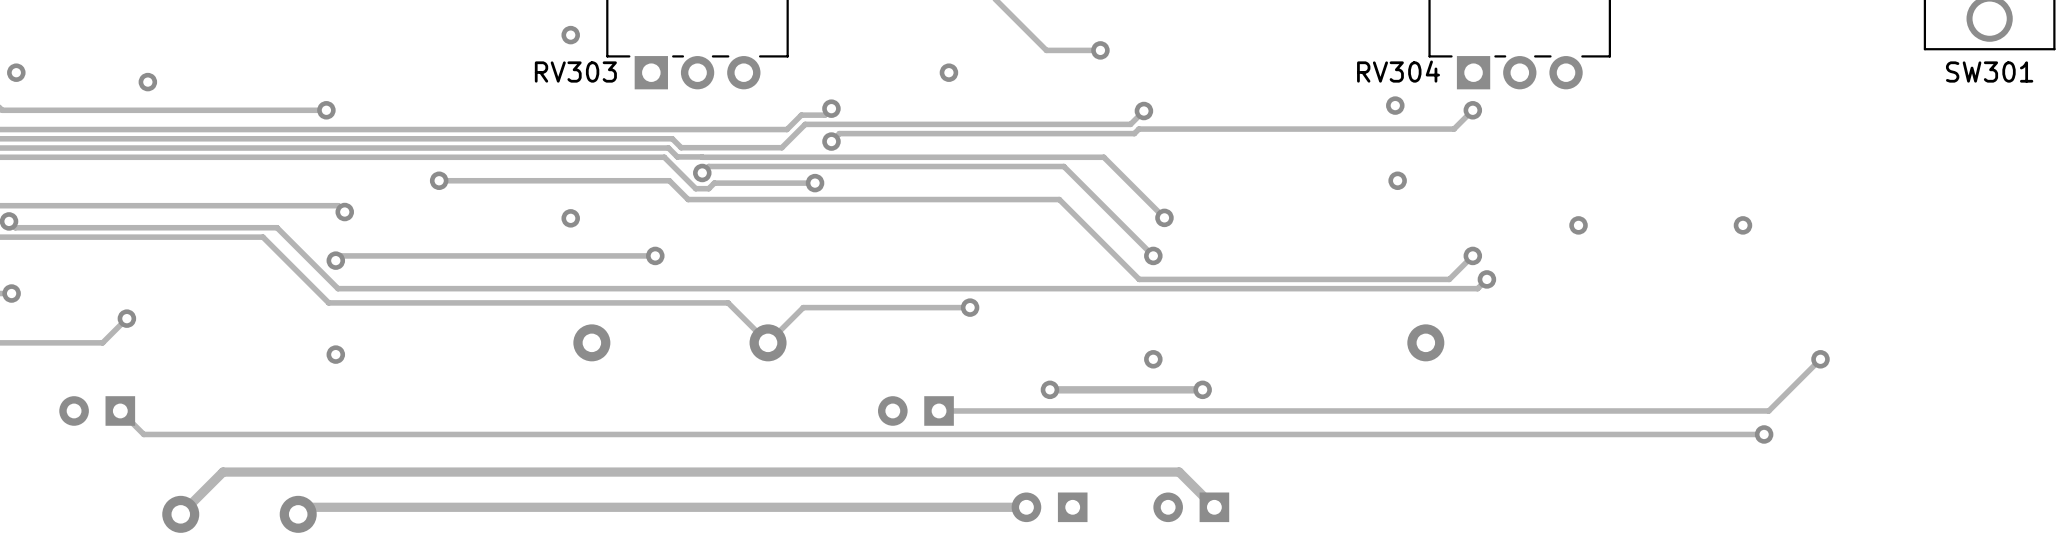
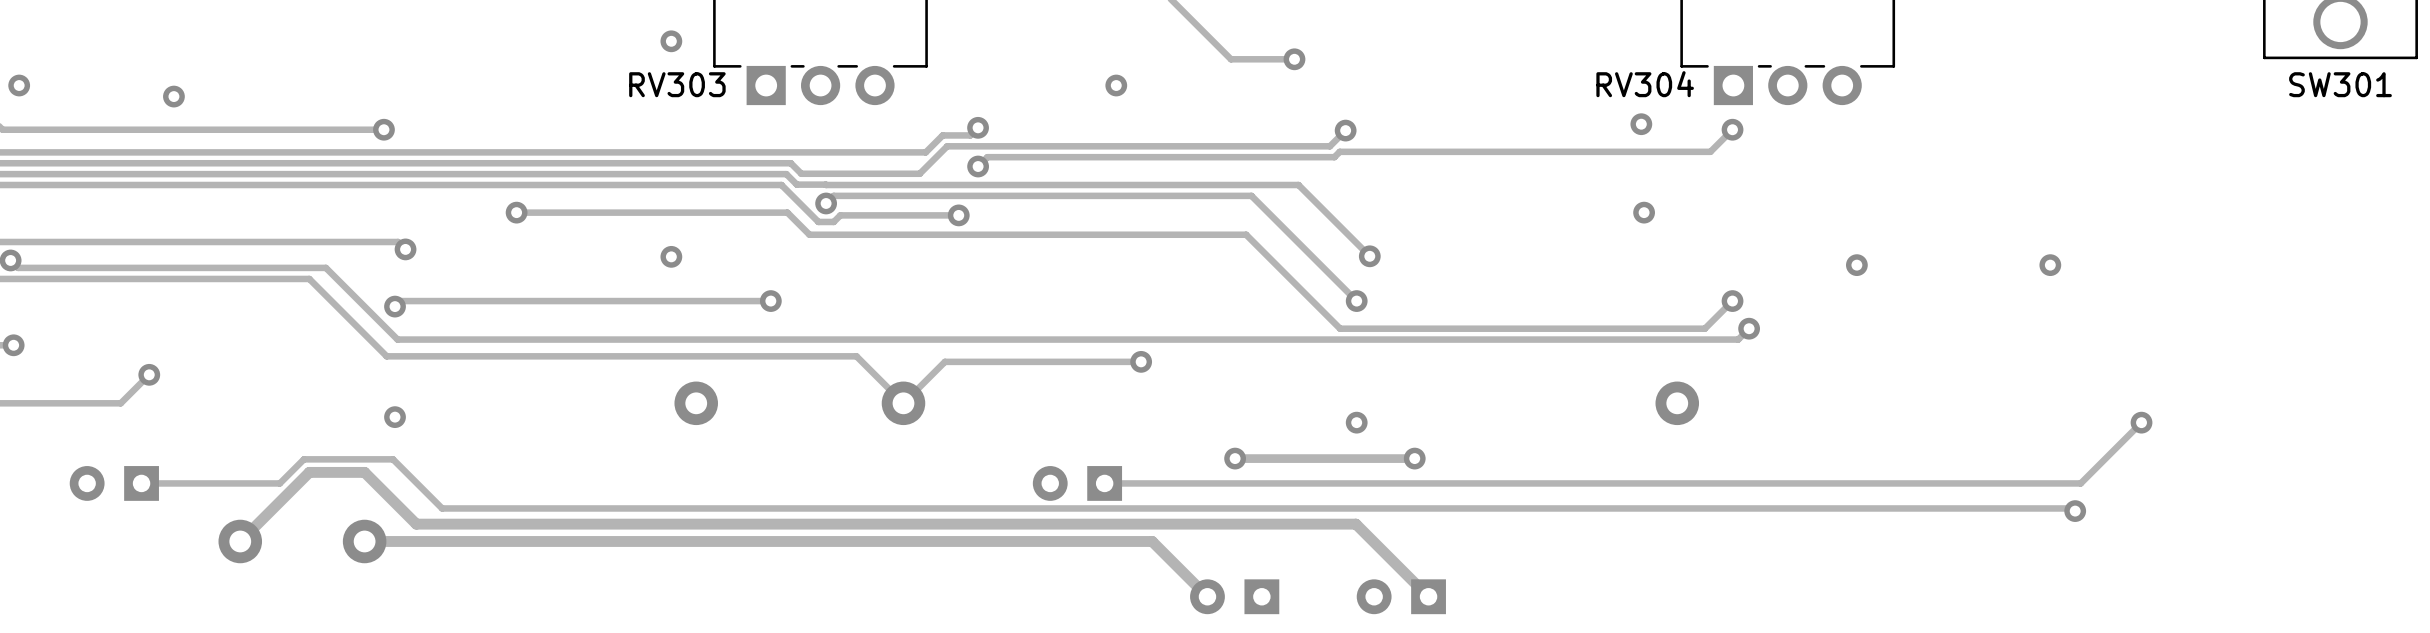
track: (120, 410) (143, 434) (1764, 434) -> (141, 483) (279, 483) (303, 459) (393, 459) (442, 508) (2072, 508) (2075, 511)
part: none -> (240, 541)
part: none -> (364, 541)
track: (1179, 472) (223, 472) (180, 514) -> (1387, 555) (1355, 524) (416, 524) (364, 472) (309, 472) (240, 541)
track: (1026, 507) (305, 507) (298, 514) -> (1207, 596) (1152, 541) (364, 541)
part: (180, 514) -> none
part: (298, 514) -> none

